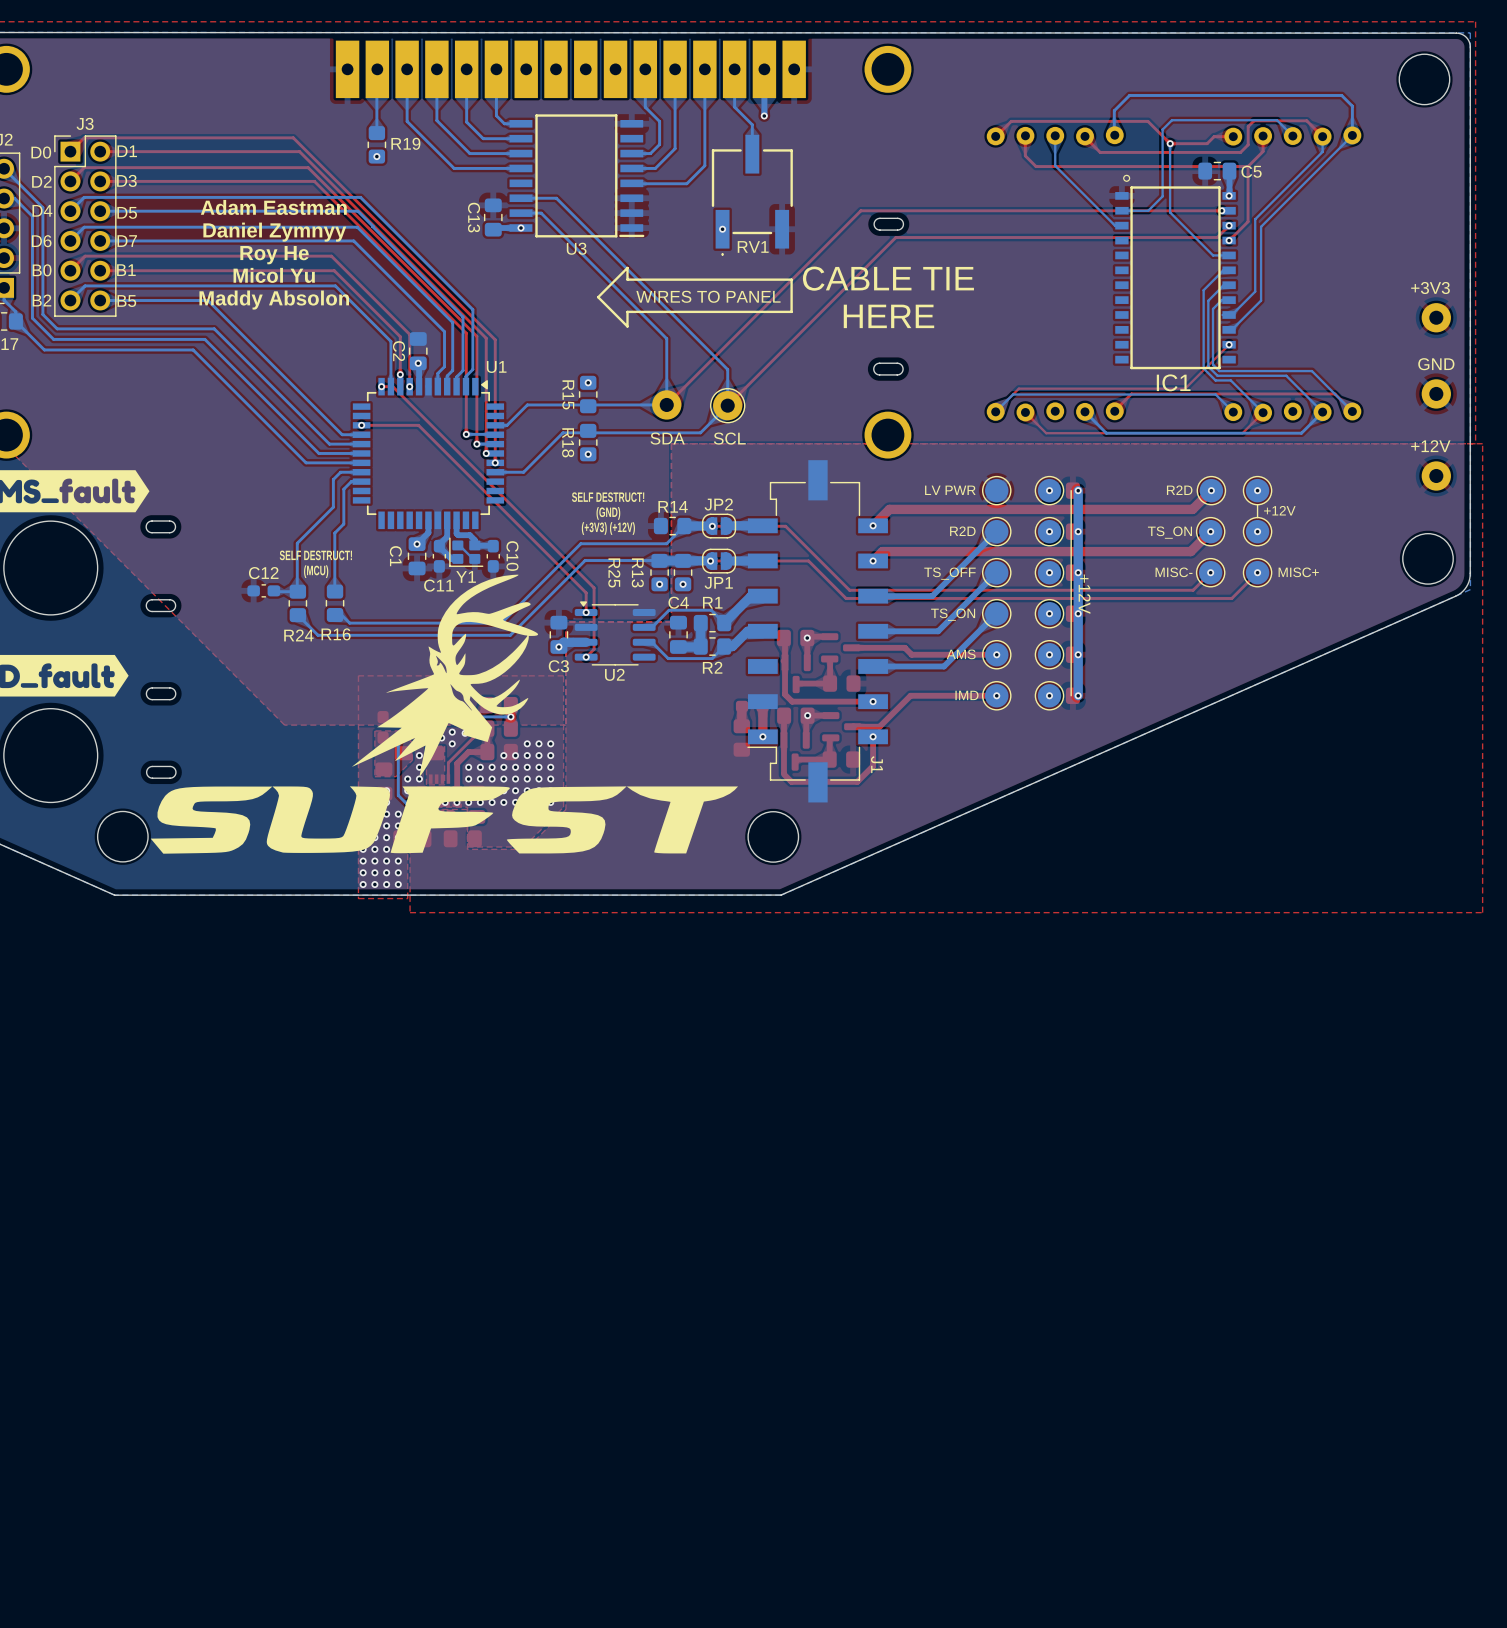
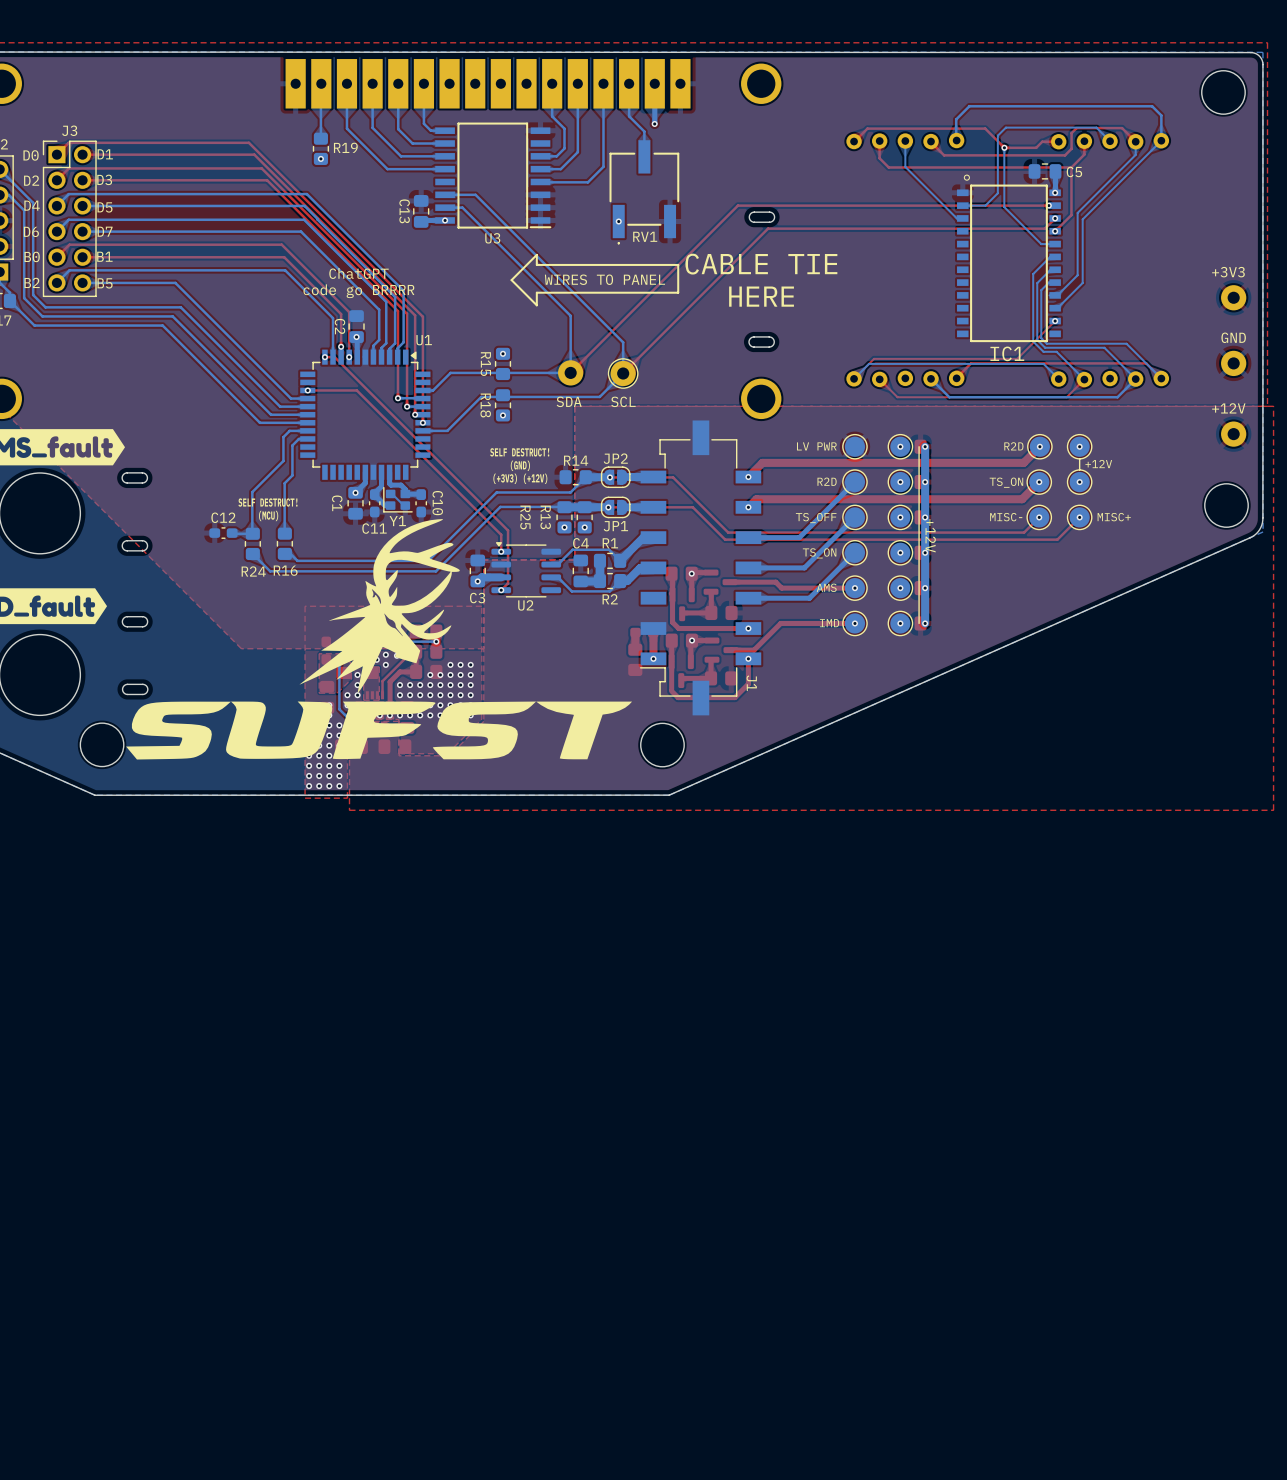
text: Adam Eastman (273, 207) -> none
text: Daniel Zymnyy (274, 232) -> none
text: Roy He (274, 255) -> none
text: Micol Yu (274, 275) -> none
text: none -> ChatGPT (359, 273)
text: Maddy Absolon (274, 300) -> none
text: none -> code go BRRRR (358, 291)

